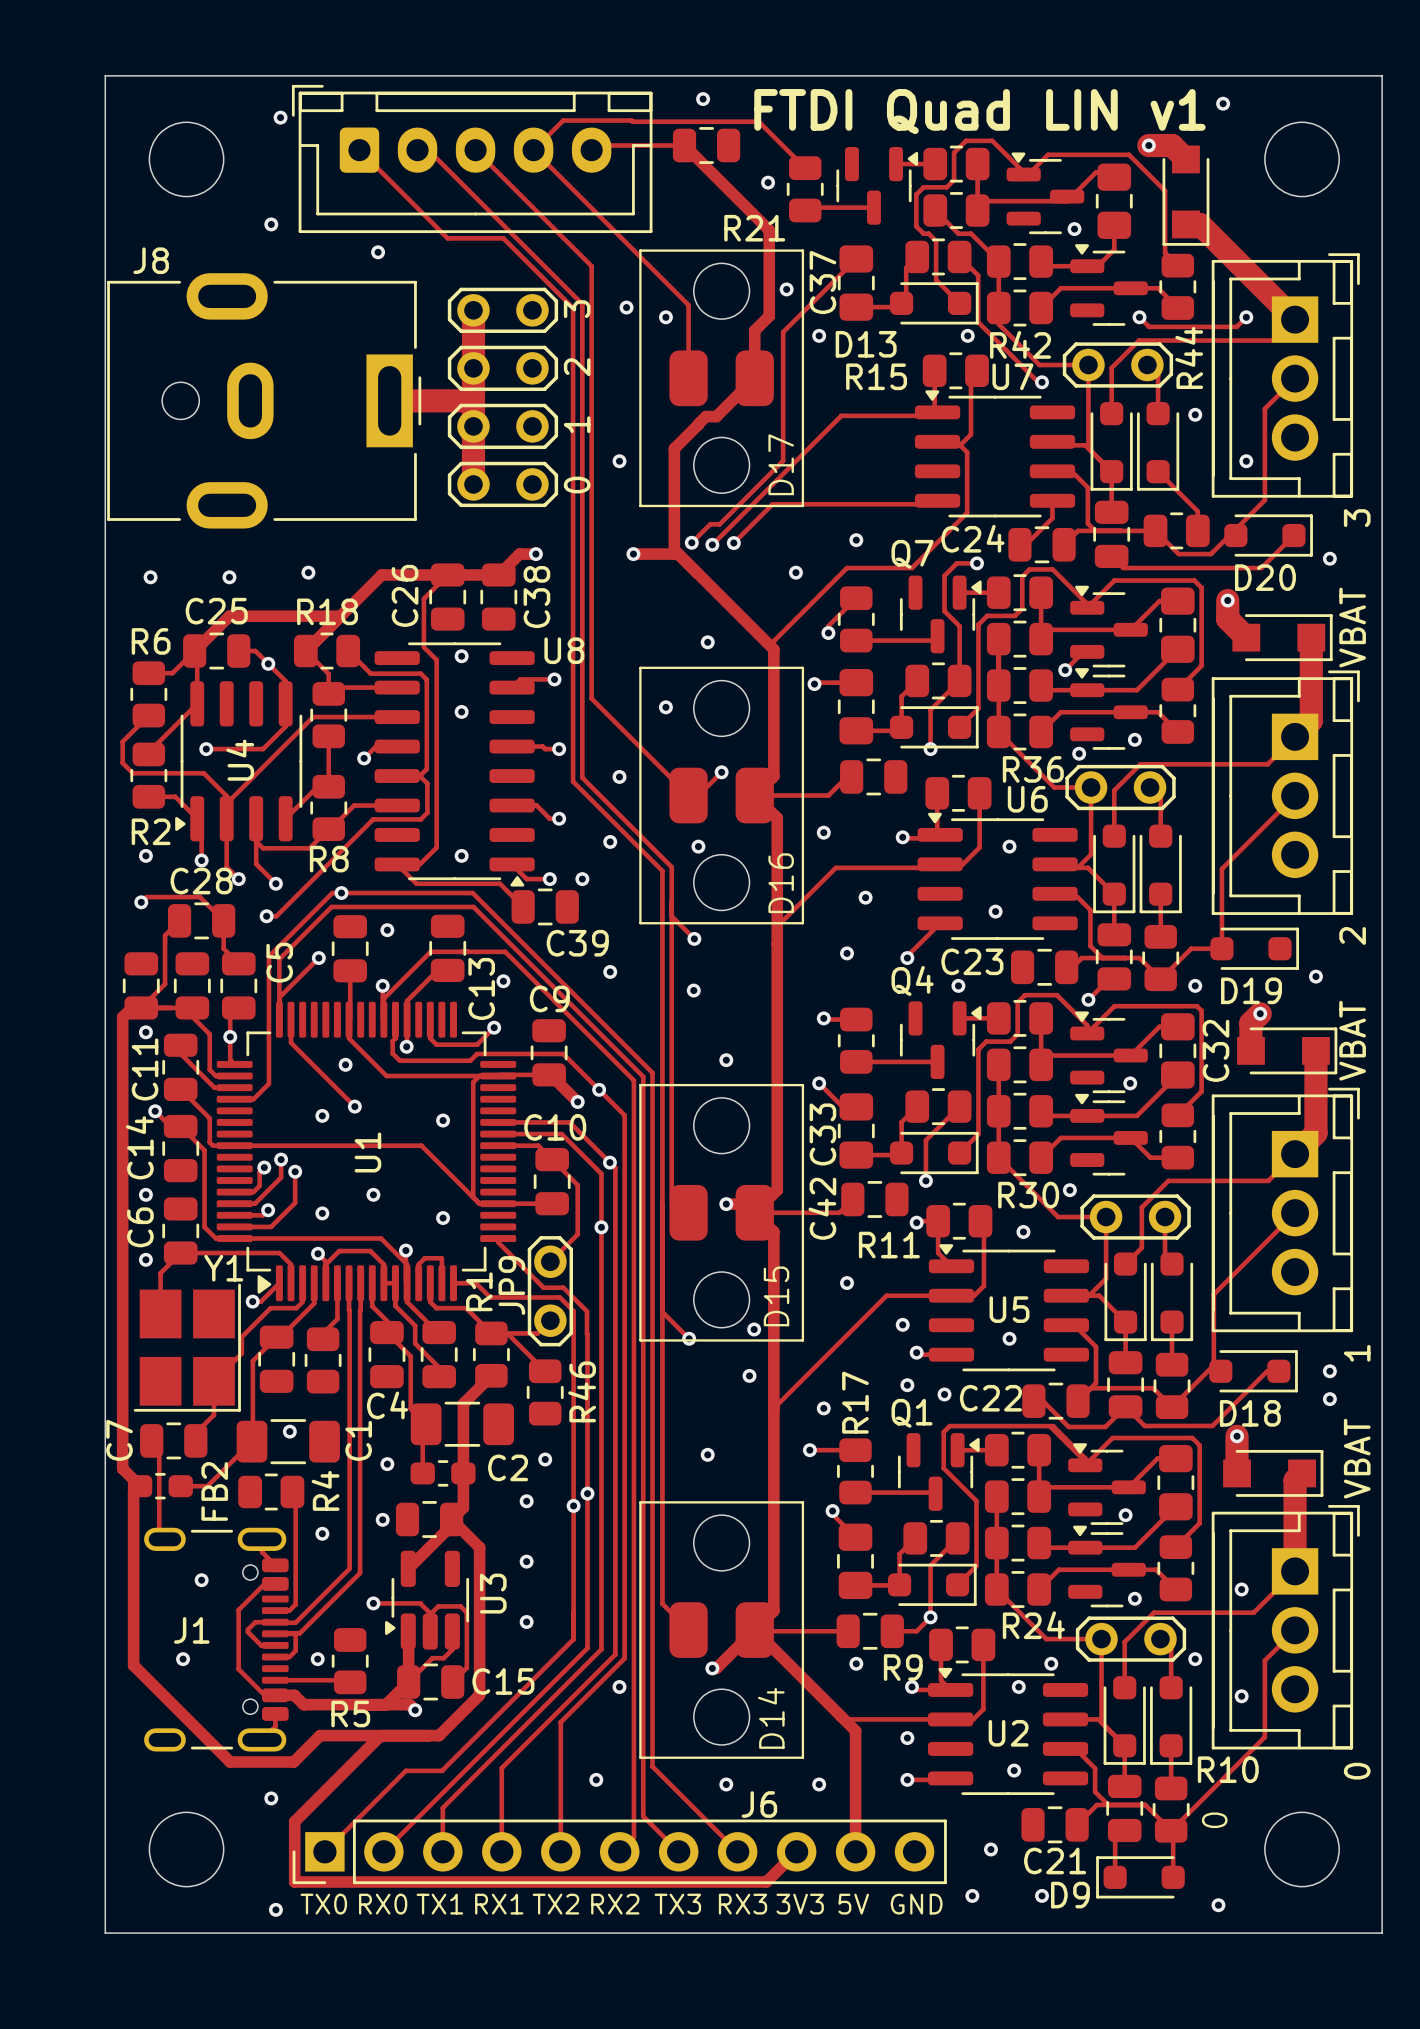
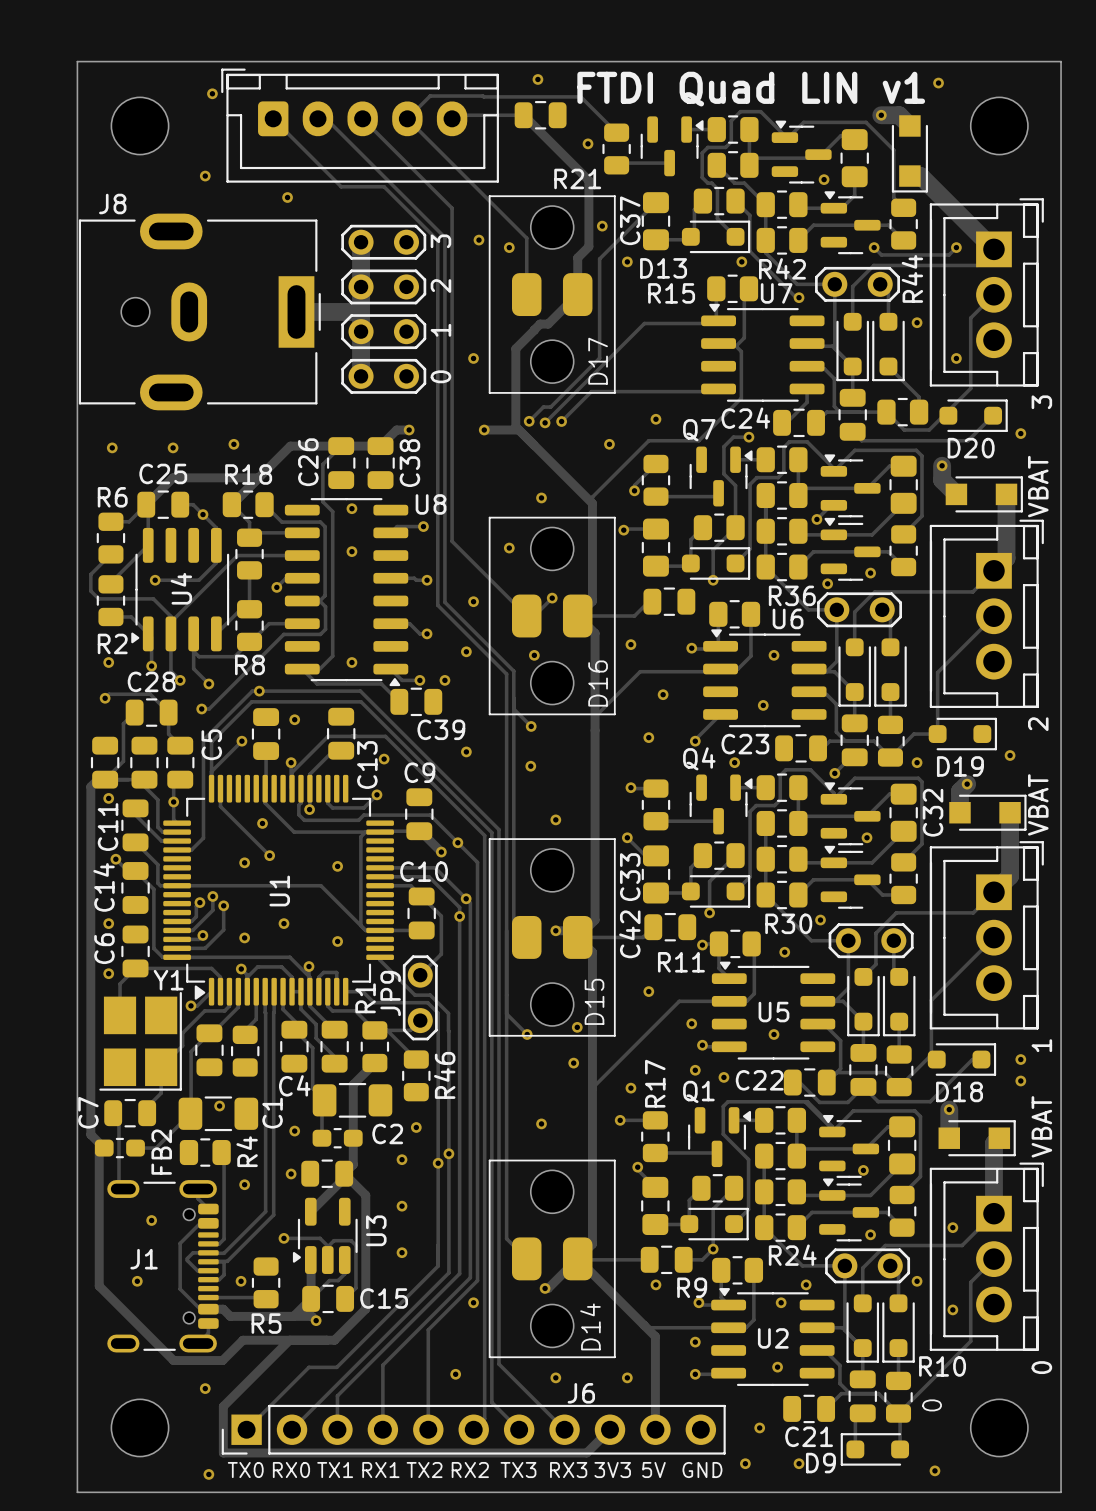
via position: (601, 1227) -> (459, 916)

